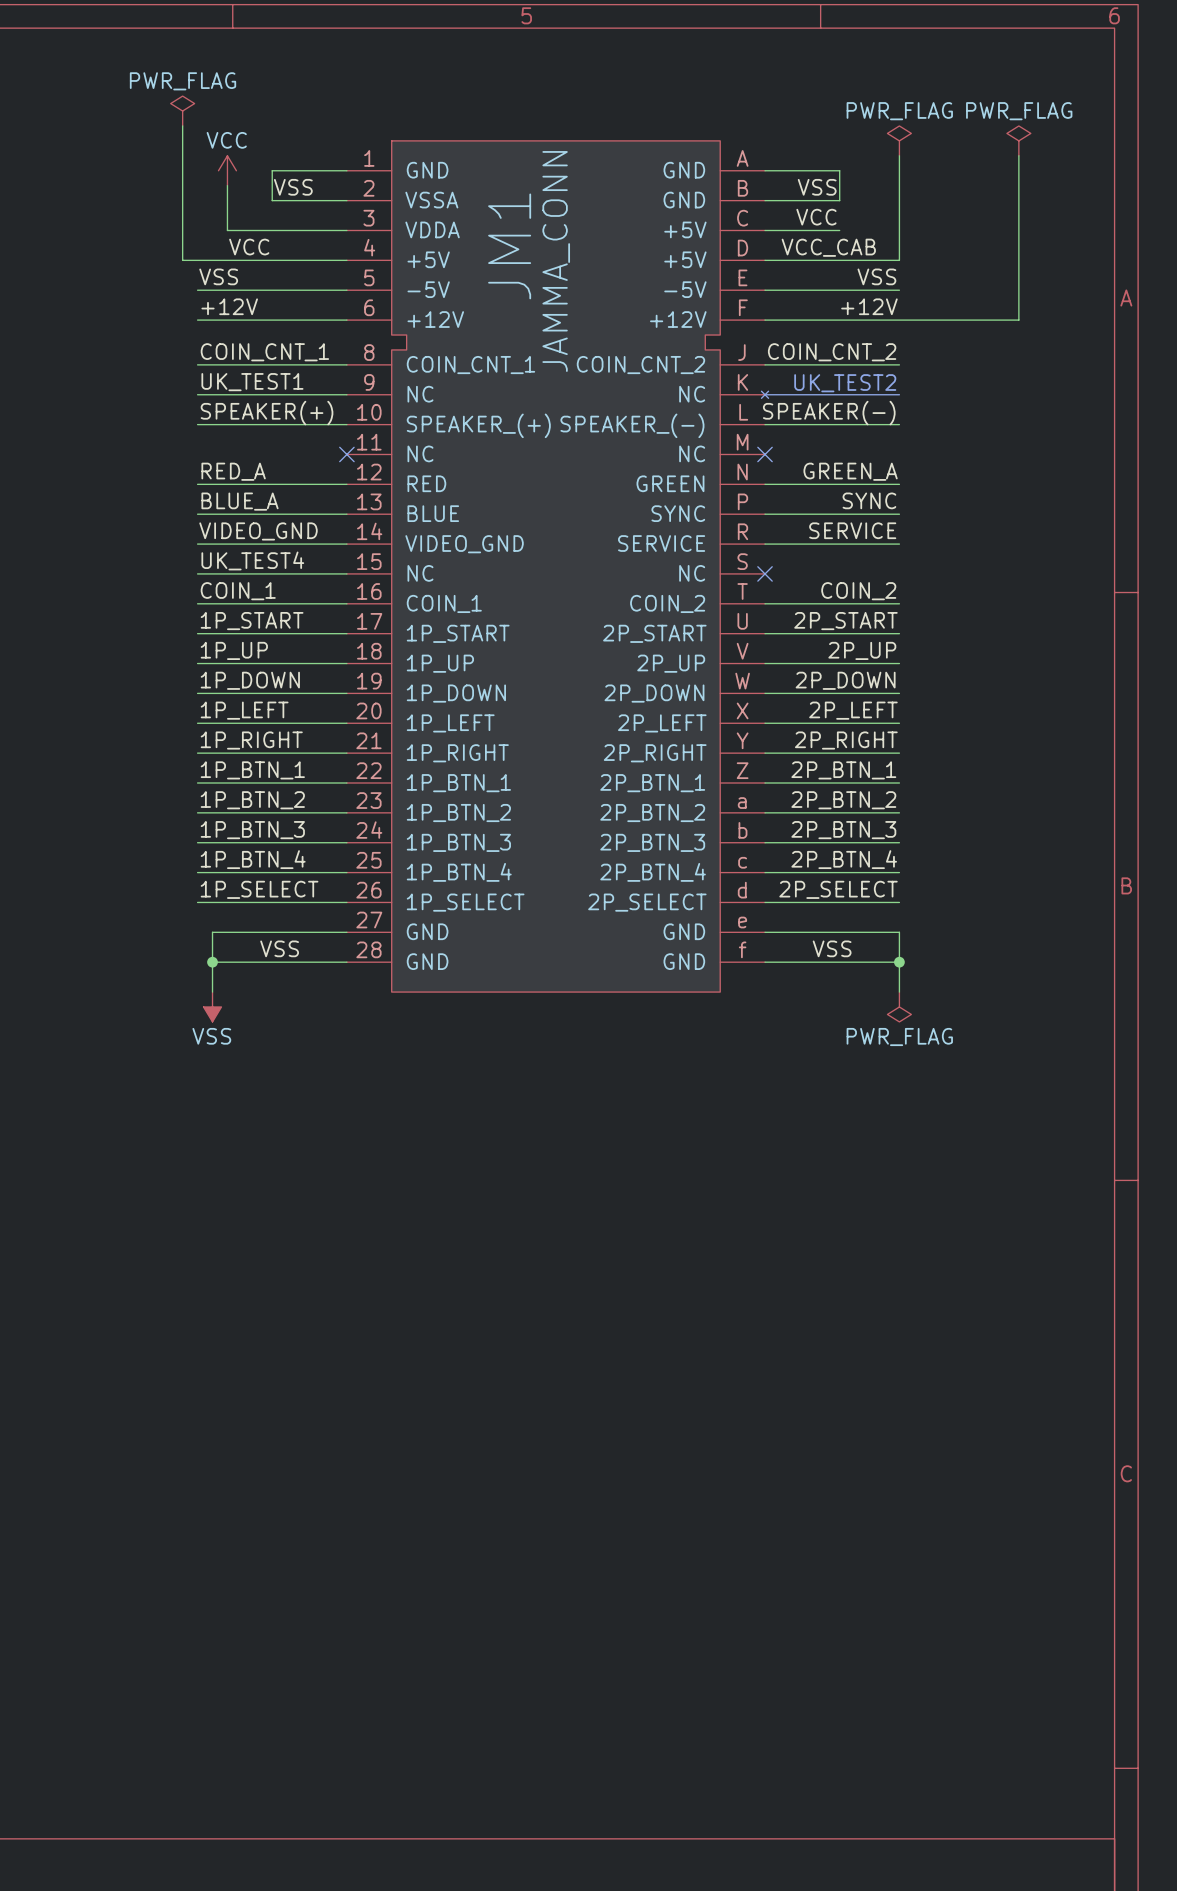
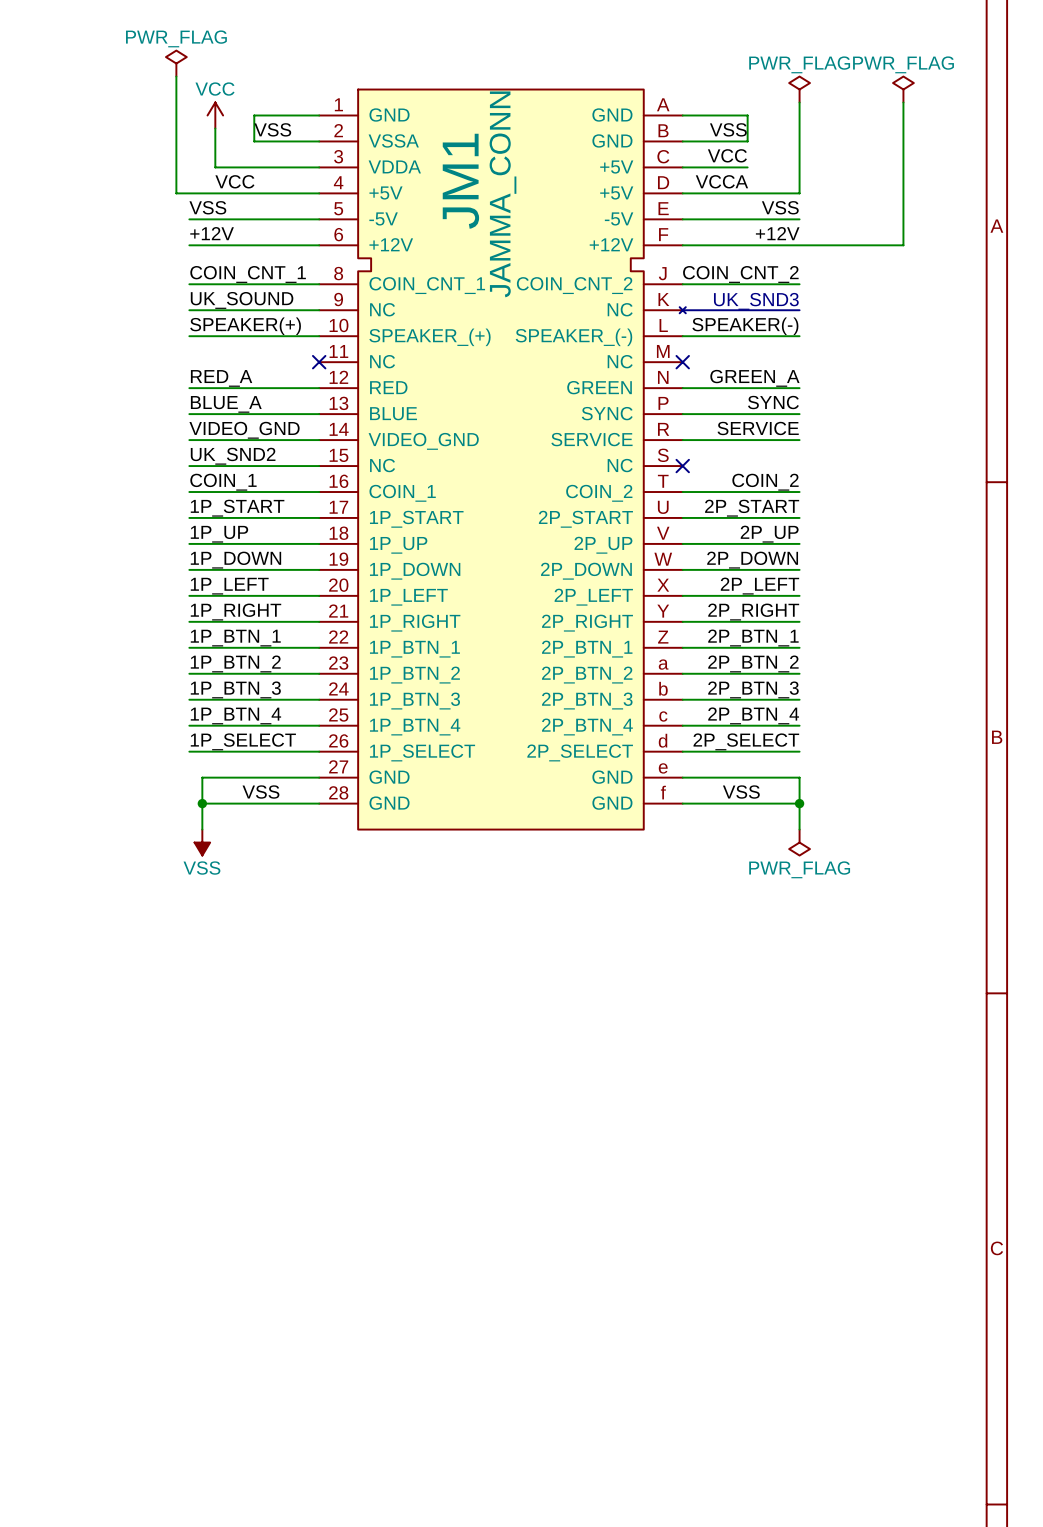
label: VCC_CAB (828, 247) -> VCCA (721, 181)
label: UK_TEST1 (252, 382) -> UK_SOUND (242, 300)
text: UK_TEST2 (845, 383) -> UK_SND3 (756, 301)
label: UK_TEST4 (252, 560) -> UK_SND2 (233, 456)

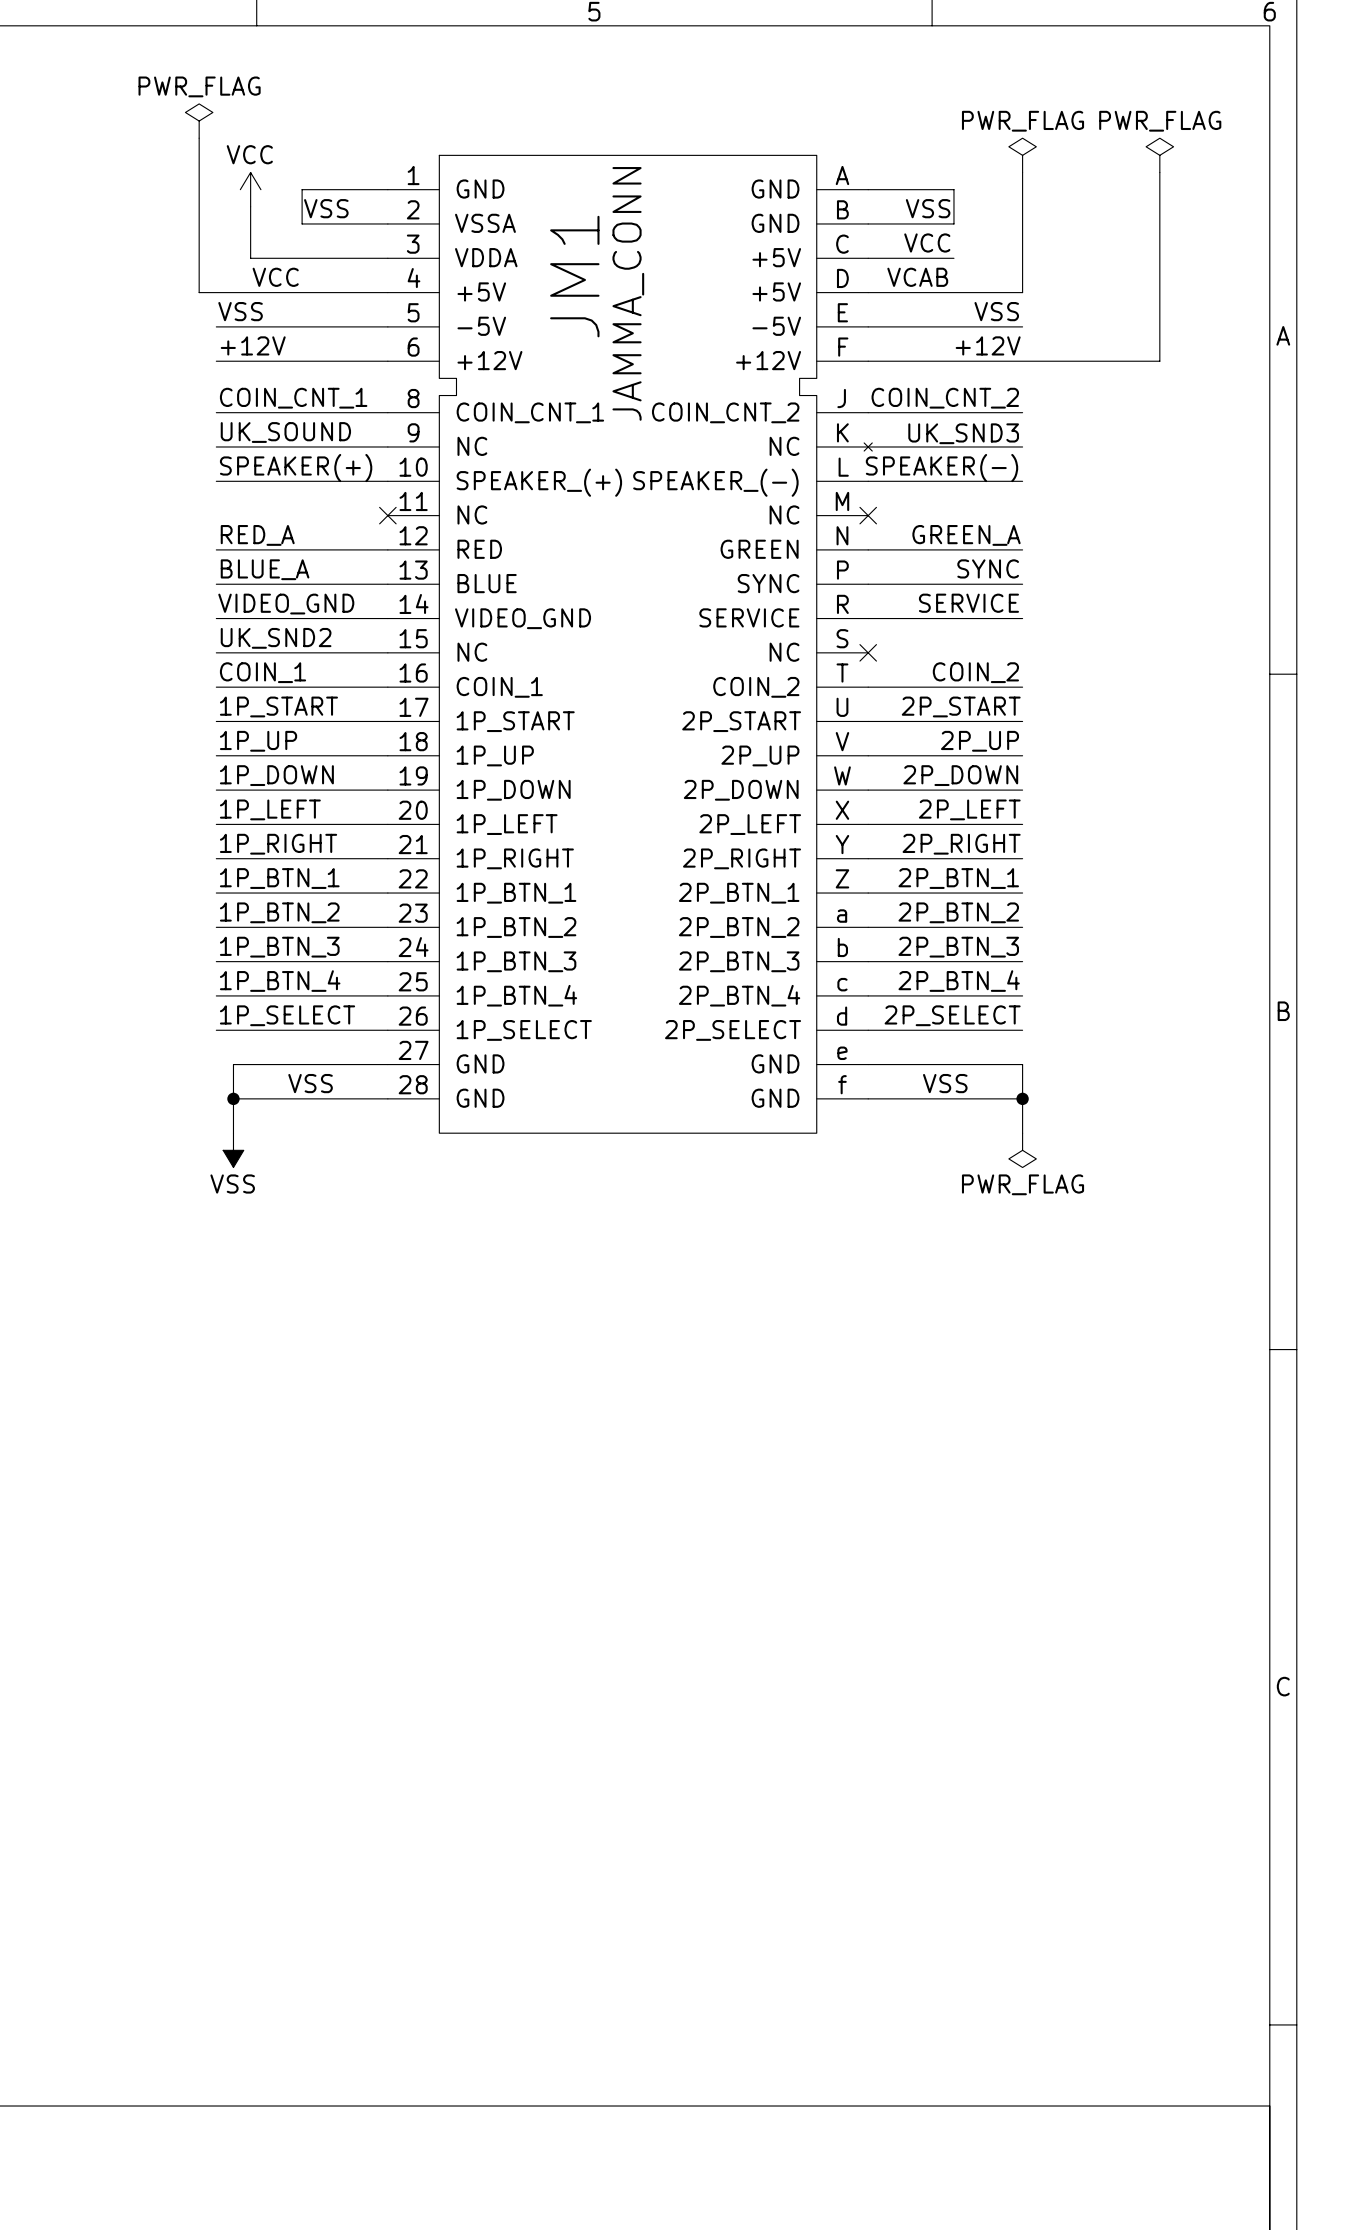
label: VCCA (721, 181) -> VCAB (917, 277)

